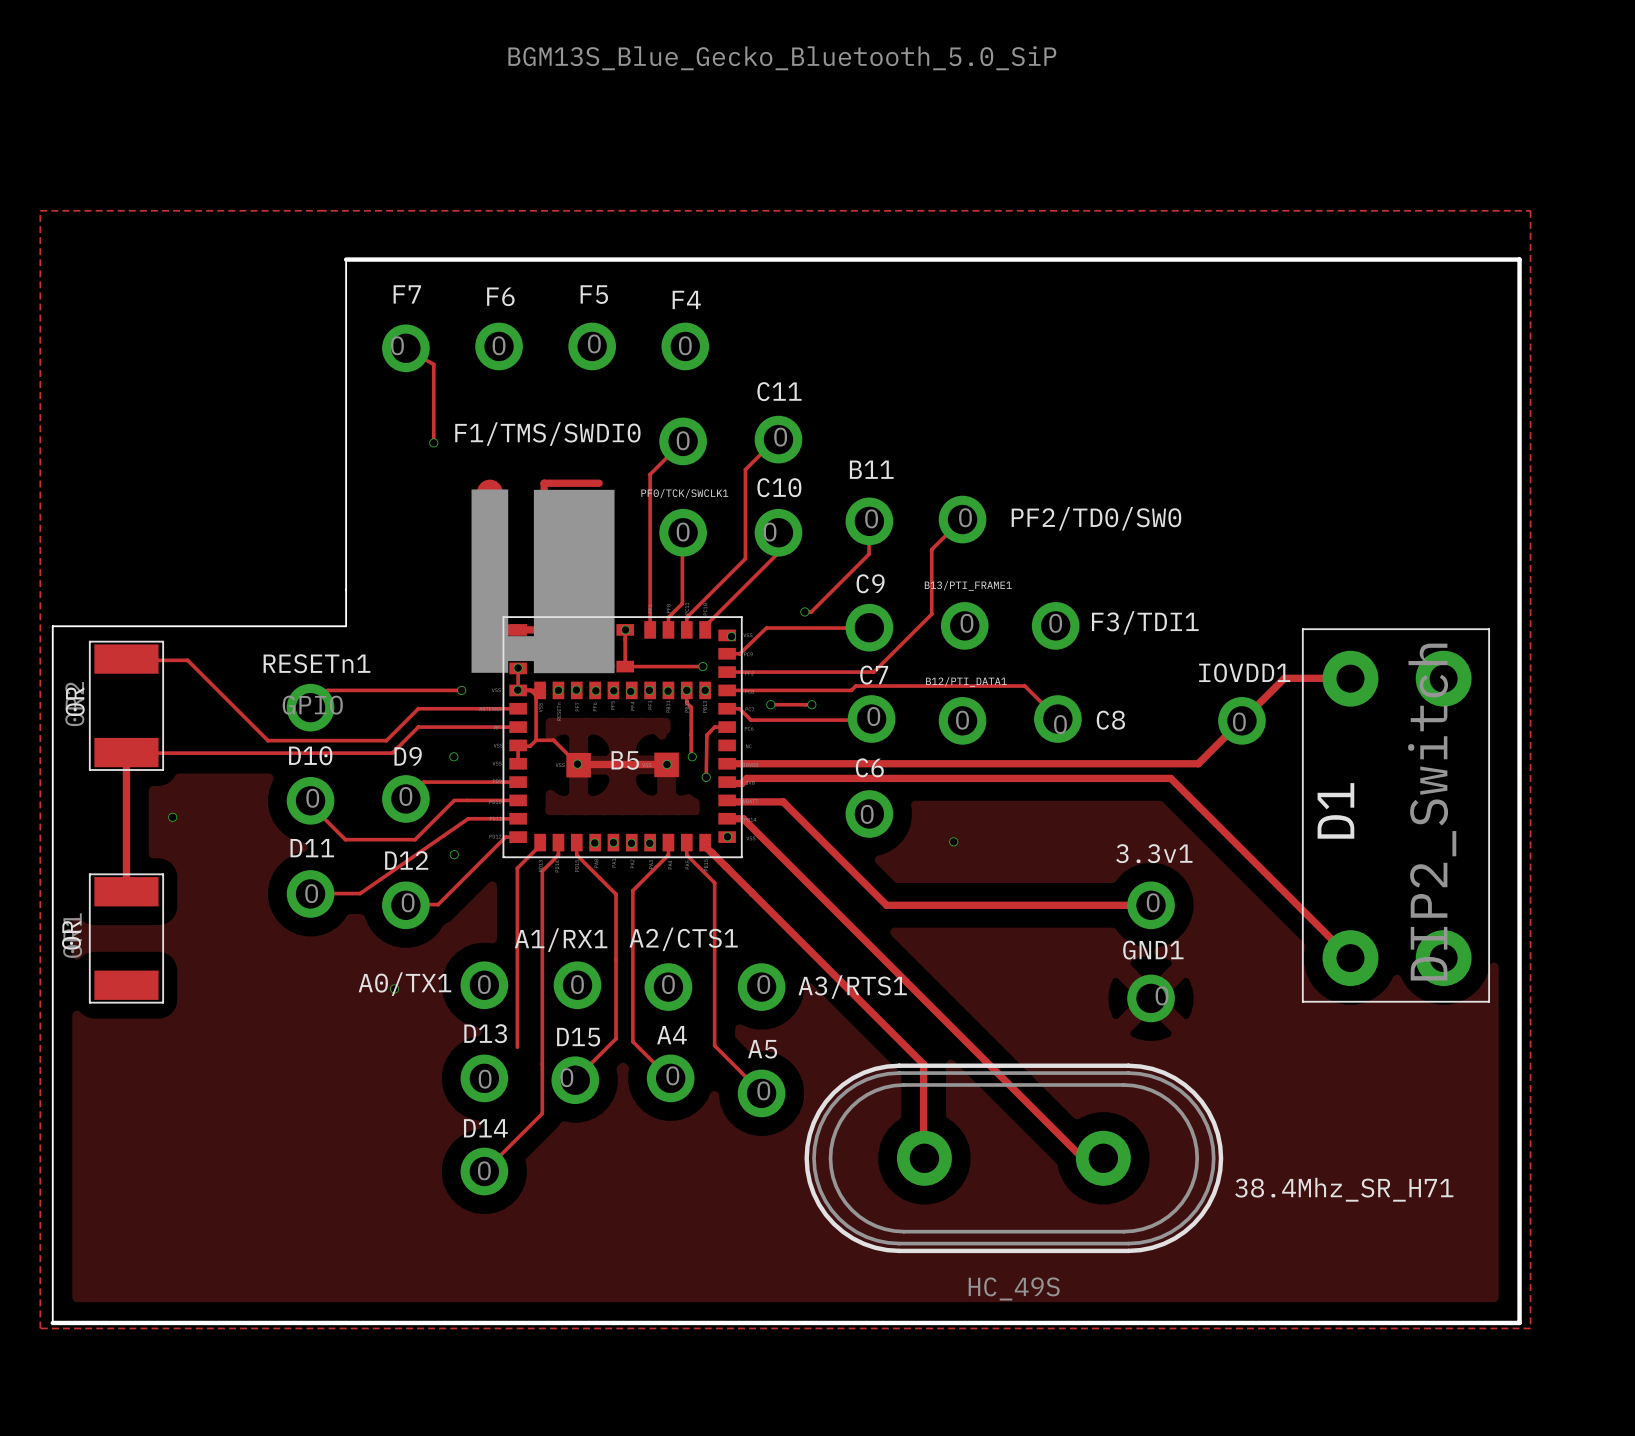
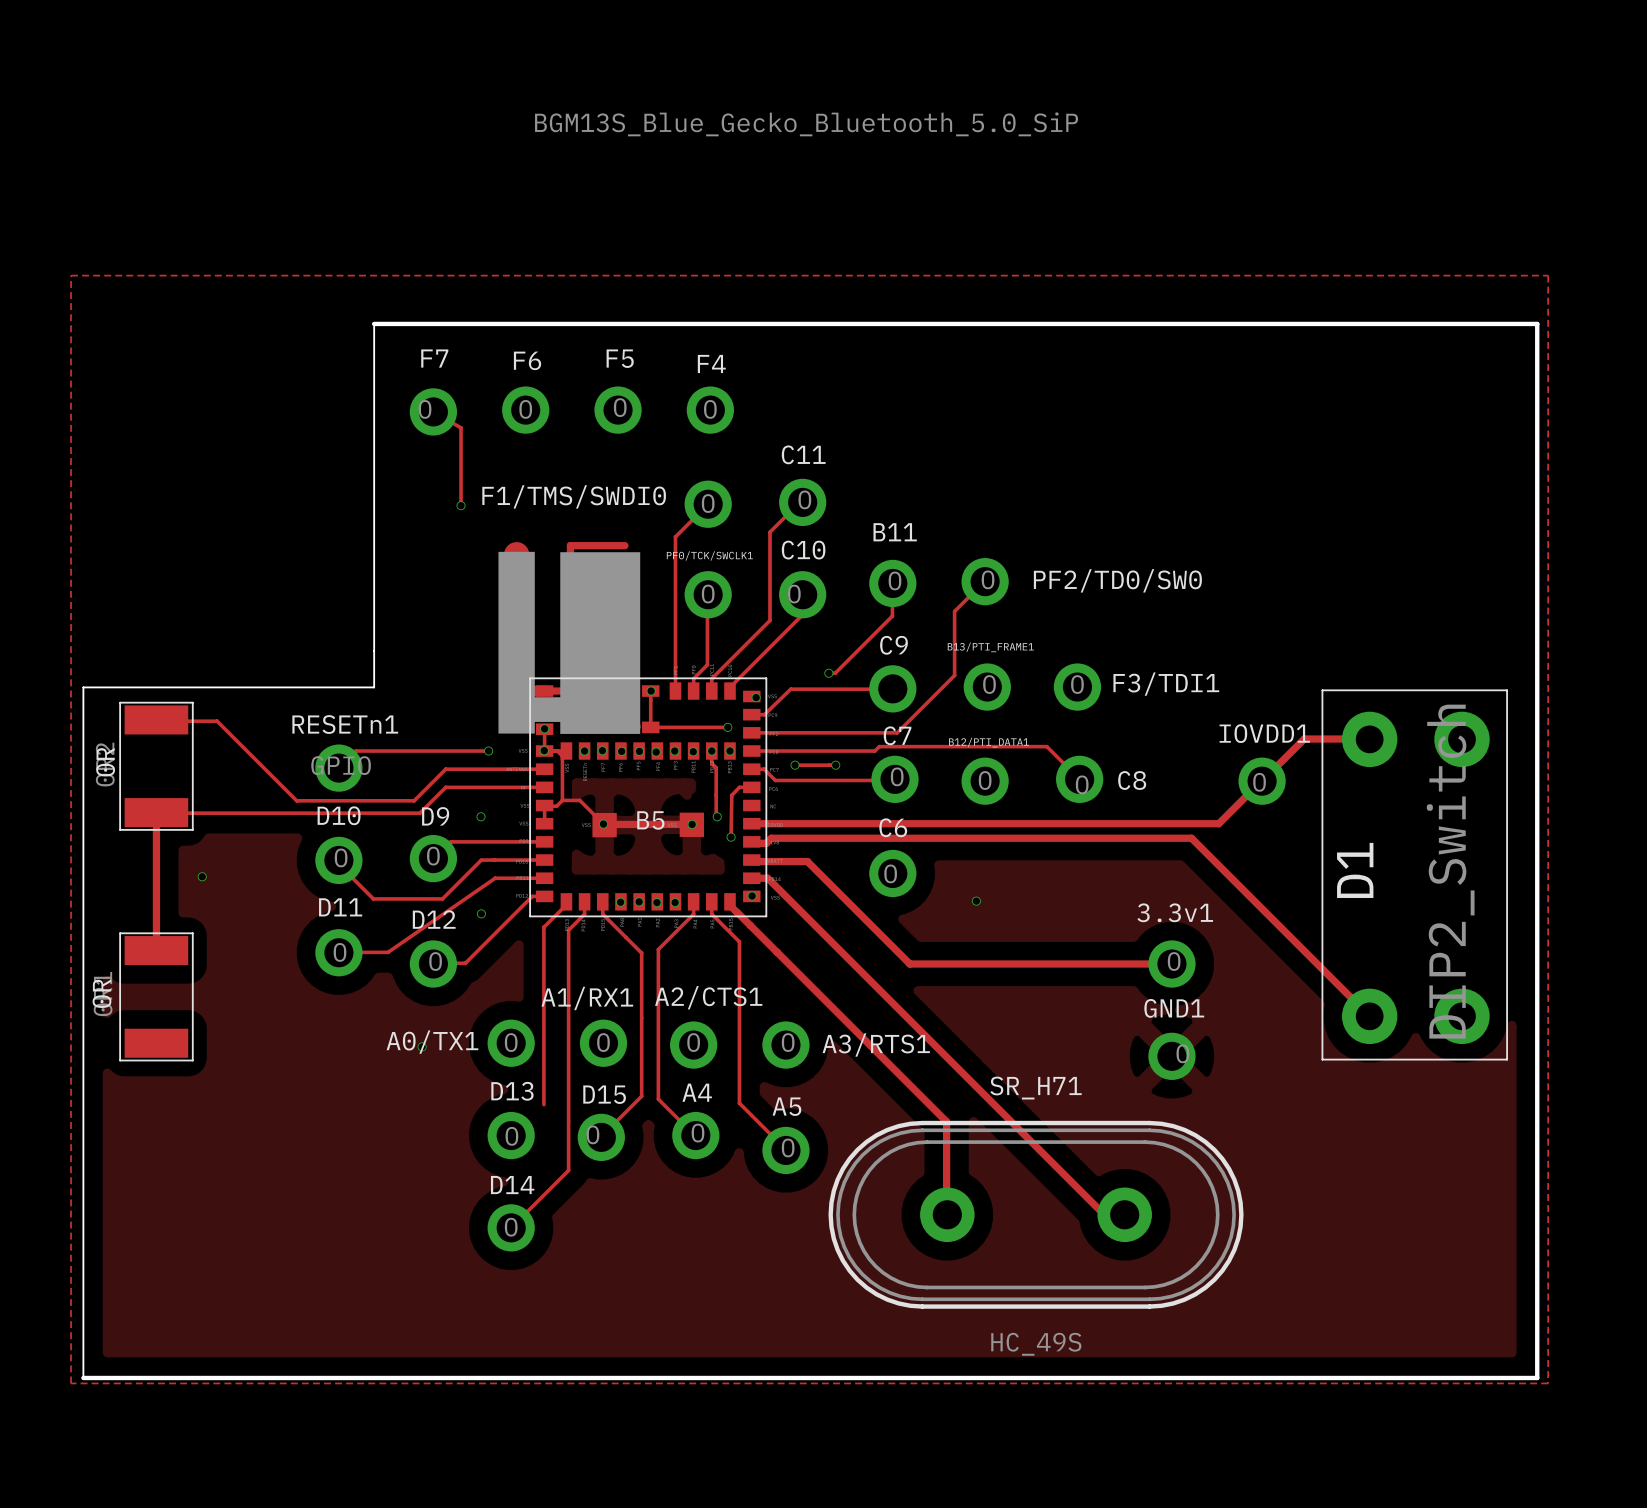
38.4Mhz_SR_H71 name: 38.4Mhz_SR_H71 (1344, 1189) -> SR_H71 (1036, 1088)

